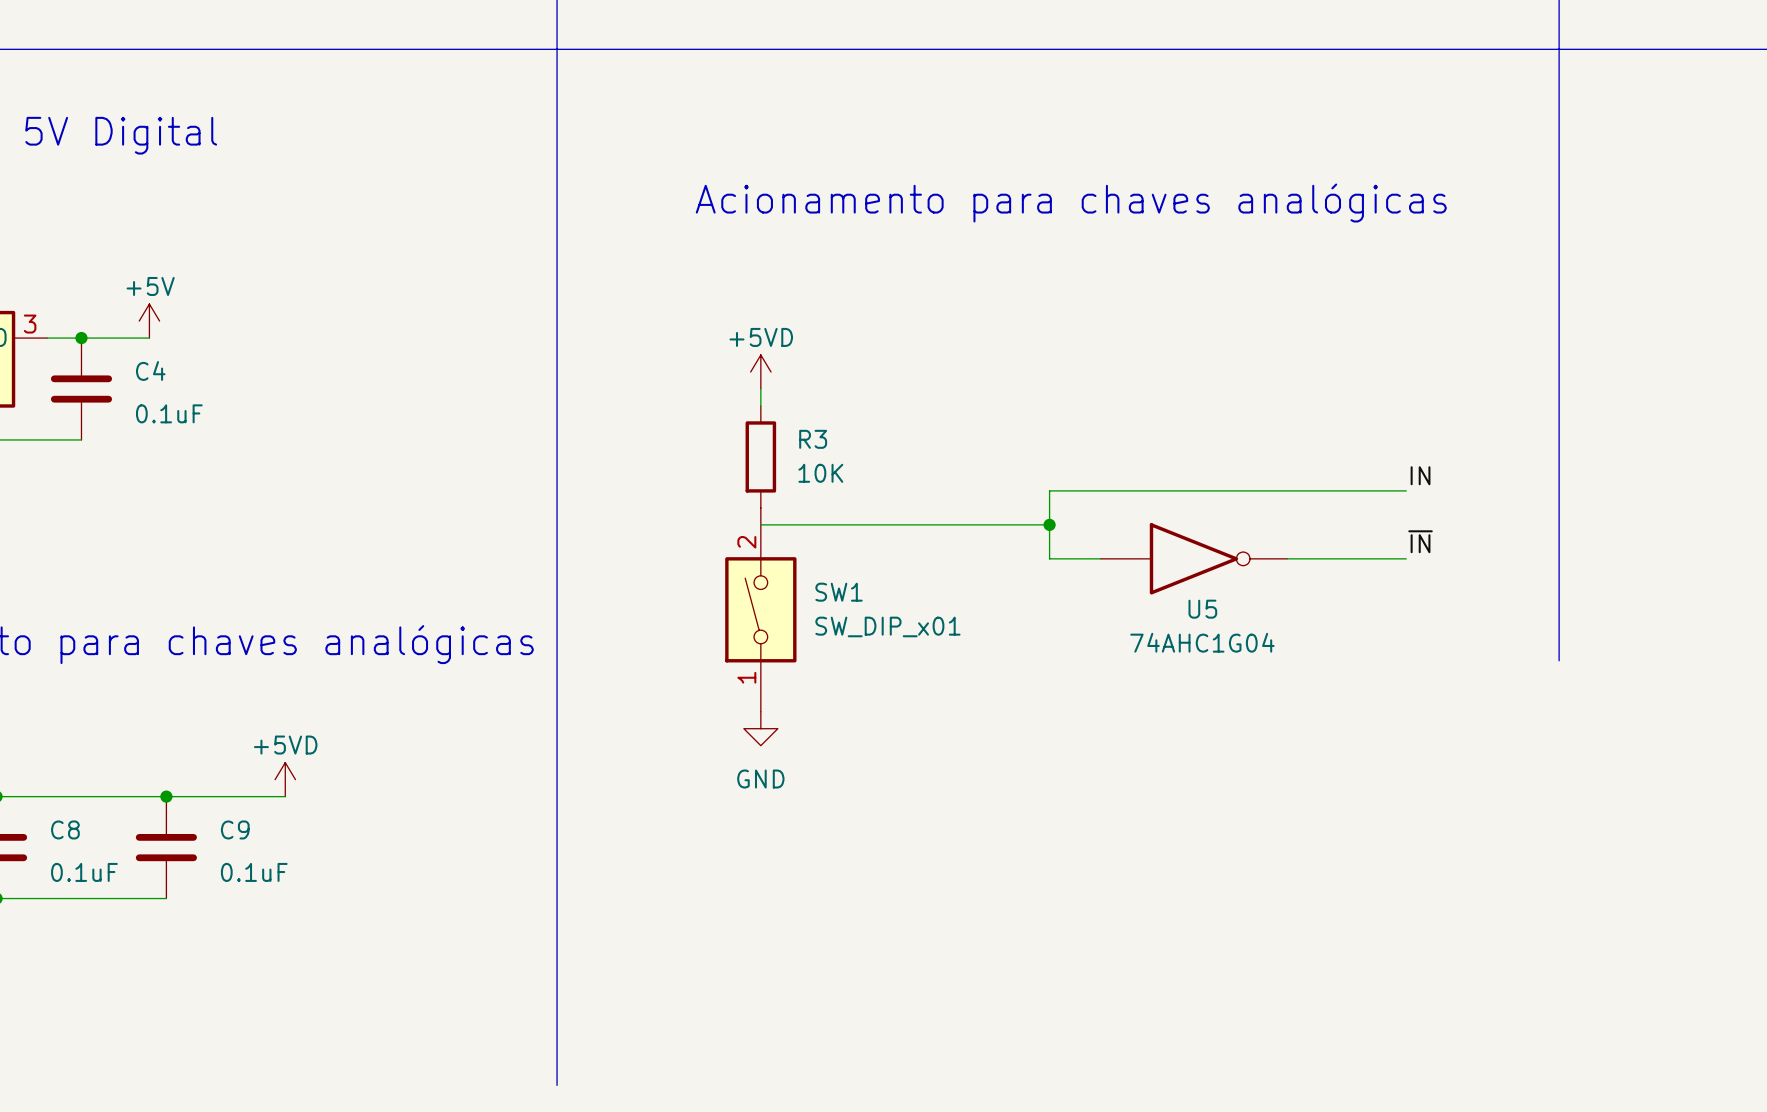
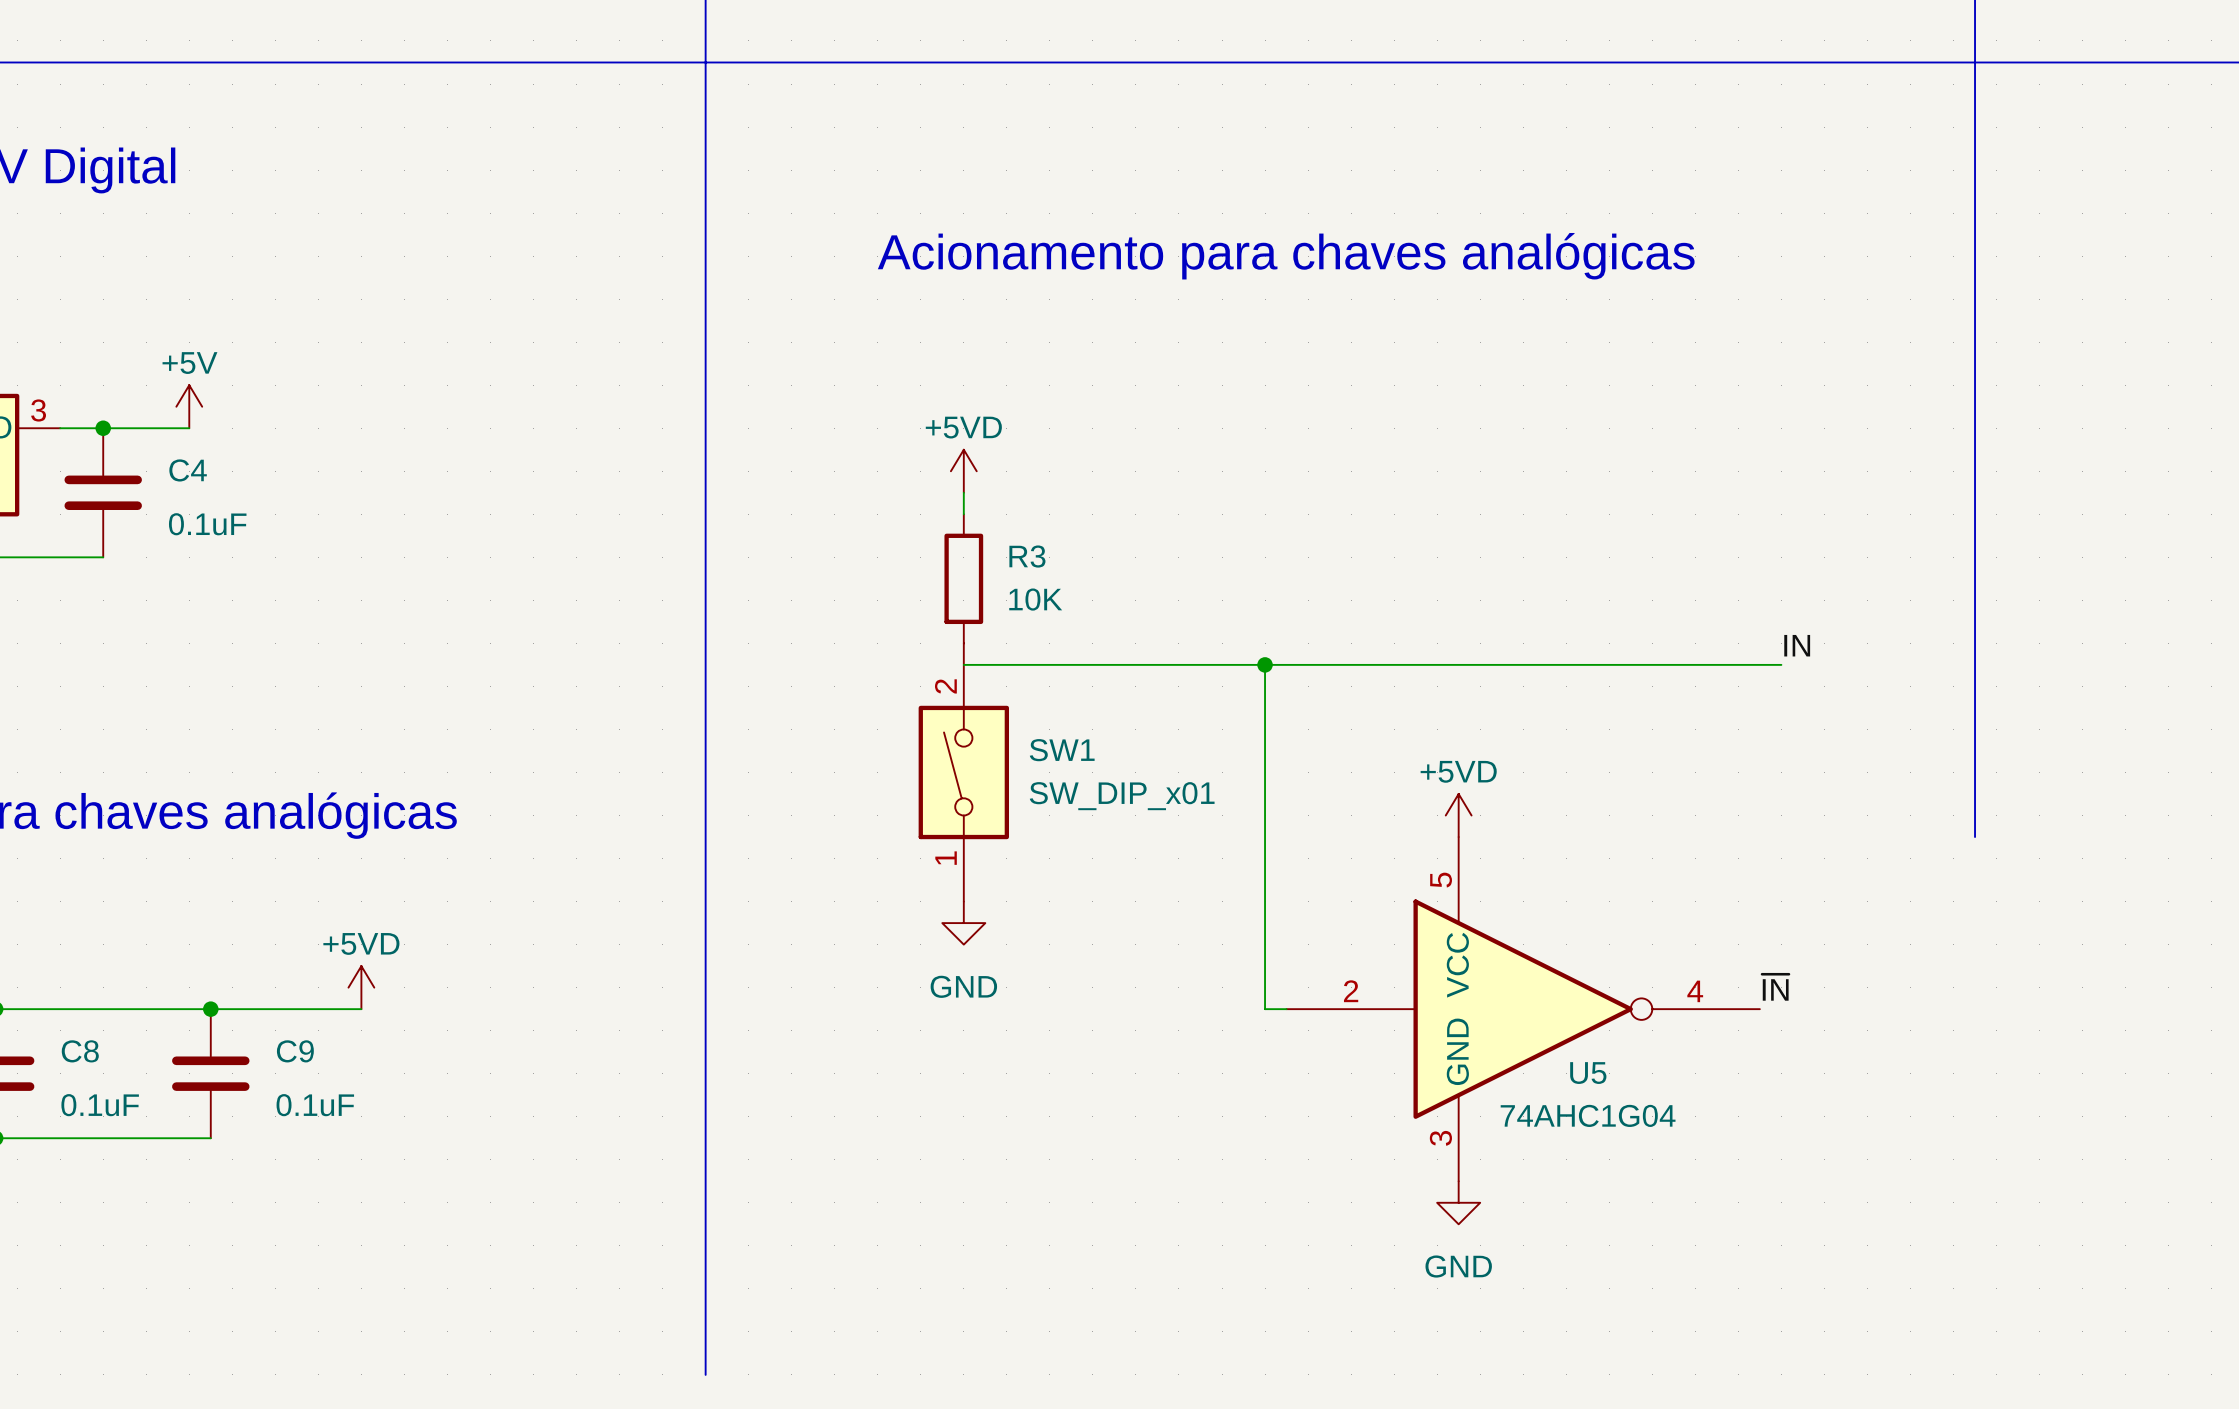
label position: IN (1420, 475) -> IN (1797, 645)
wire: (1406, 490) (1049, 490) (1049, 558) (1100, 558) -> none
U5 symbol: [1100, 523, 1288, 595] -> [1286, 837, 1760, 1182]
wire: none -> (1265, 664) (1265, 1009) (1286, 1009)
wire: none -> (1329, 664) (1781, 664)
junction position: (1049, 524) -> (1265, 664)
label position: ~{IN} (1420, 541) -> ~{IN} (1775, 987)
wire: (1287, 558) (1406, 558) -> none
U5 name position: U5 (1202, 609) -> U5 (1588, 1073)
U5 value position: 74AHC1G04 (1202, 642) -> 74AHC1G04 (1588, 1115)
power symbol: none -> +5VD (1458, 815)
power symbol: none -> GND (1458, 1202)

